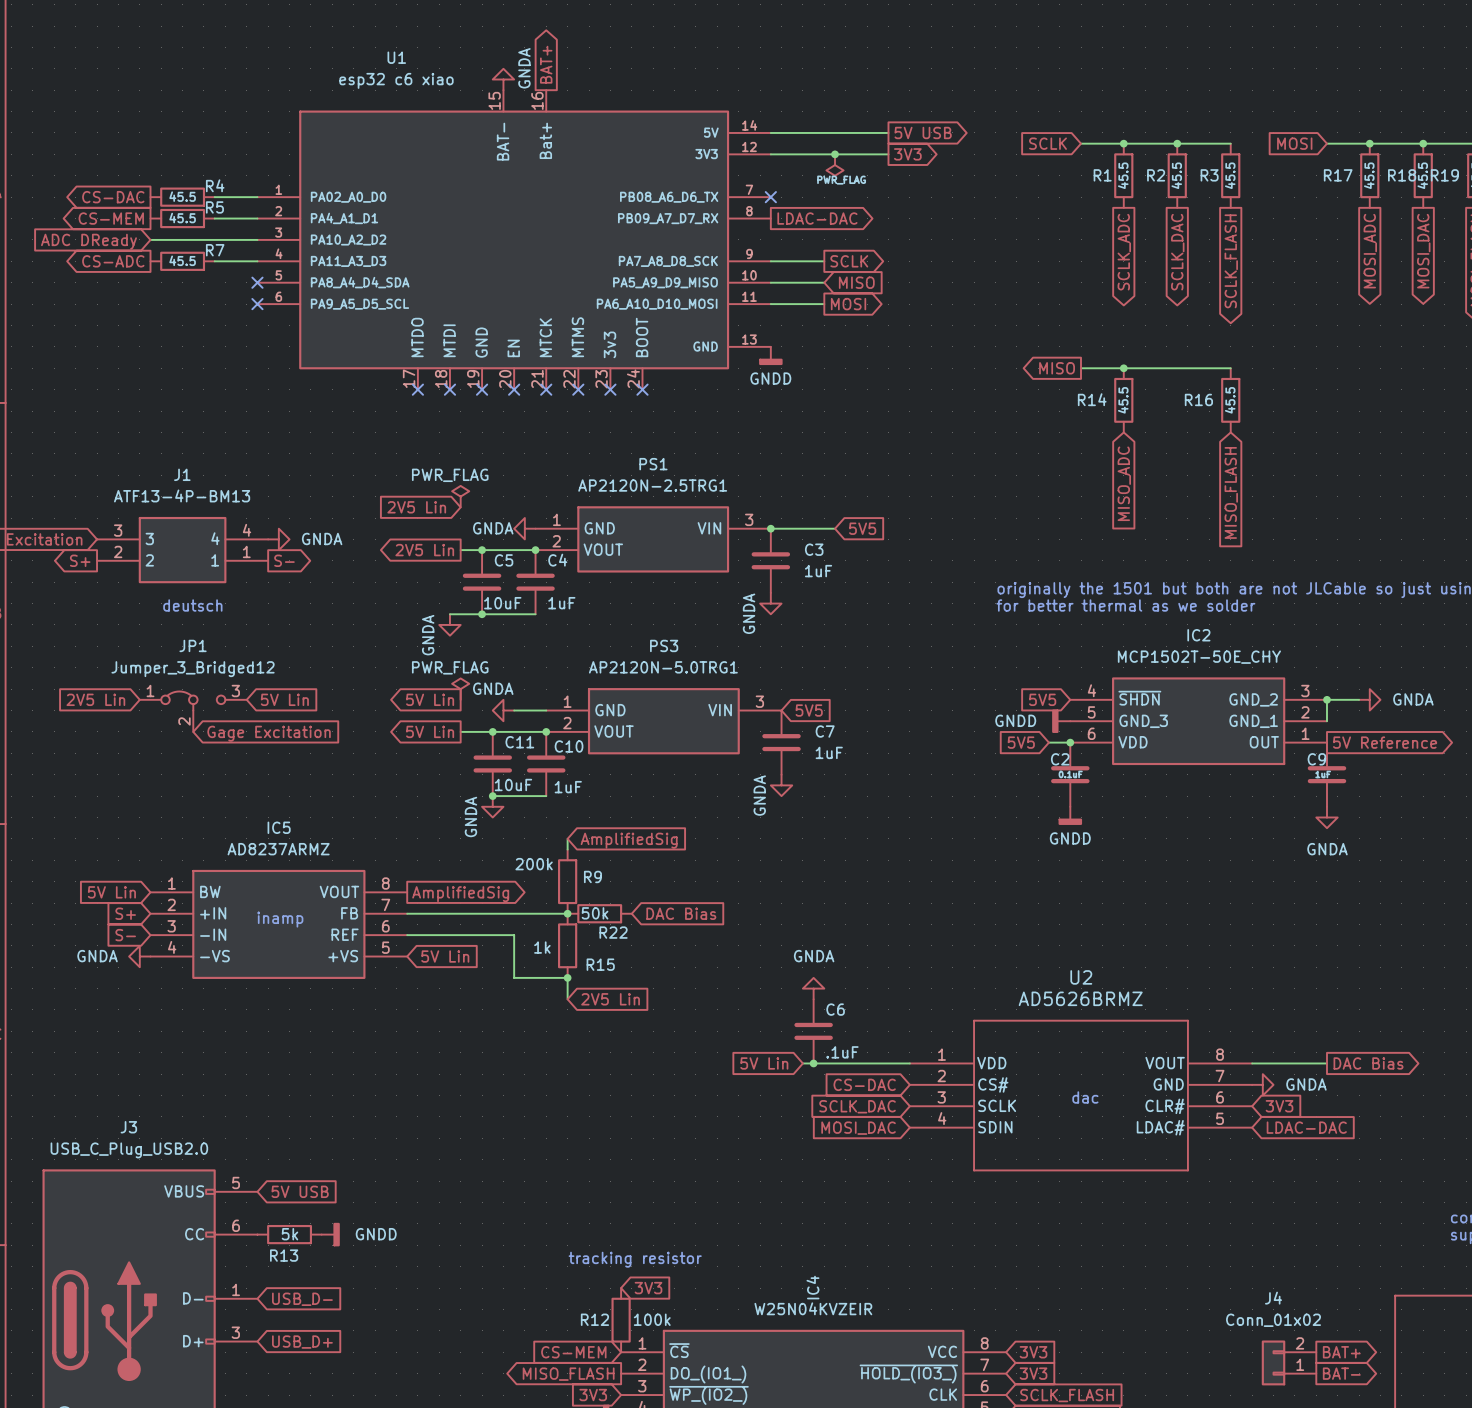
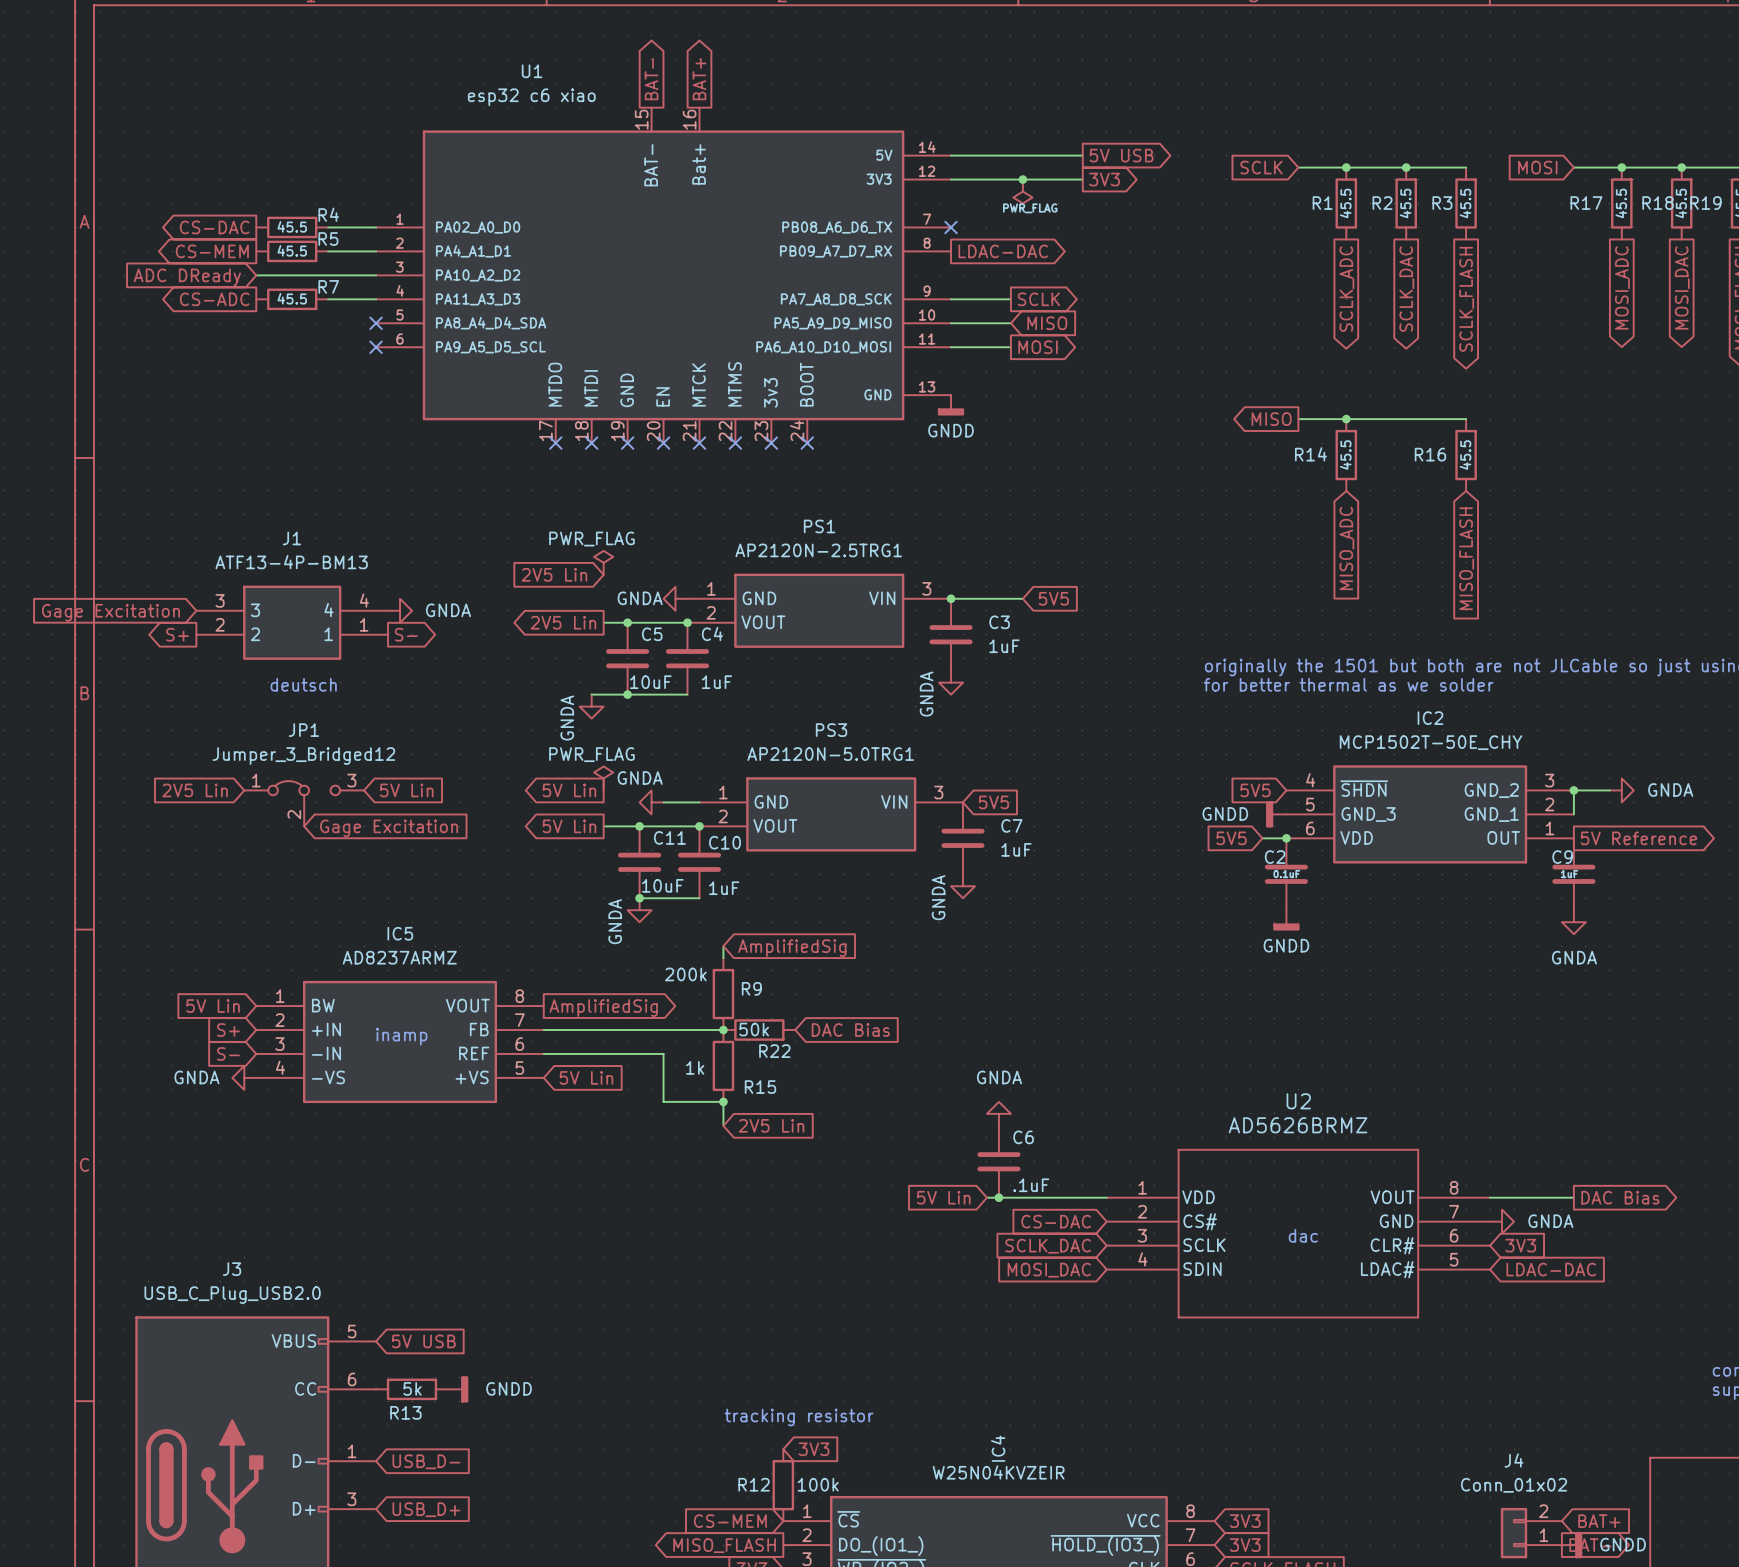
global label: none -> BAT- (651, 79)
power symbol: GNDA (503, 79) -> none
global label shape: output (1341, 1352) -> input (1599, 1521)
power symbol: none -> GNDD (1572, 1545)

